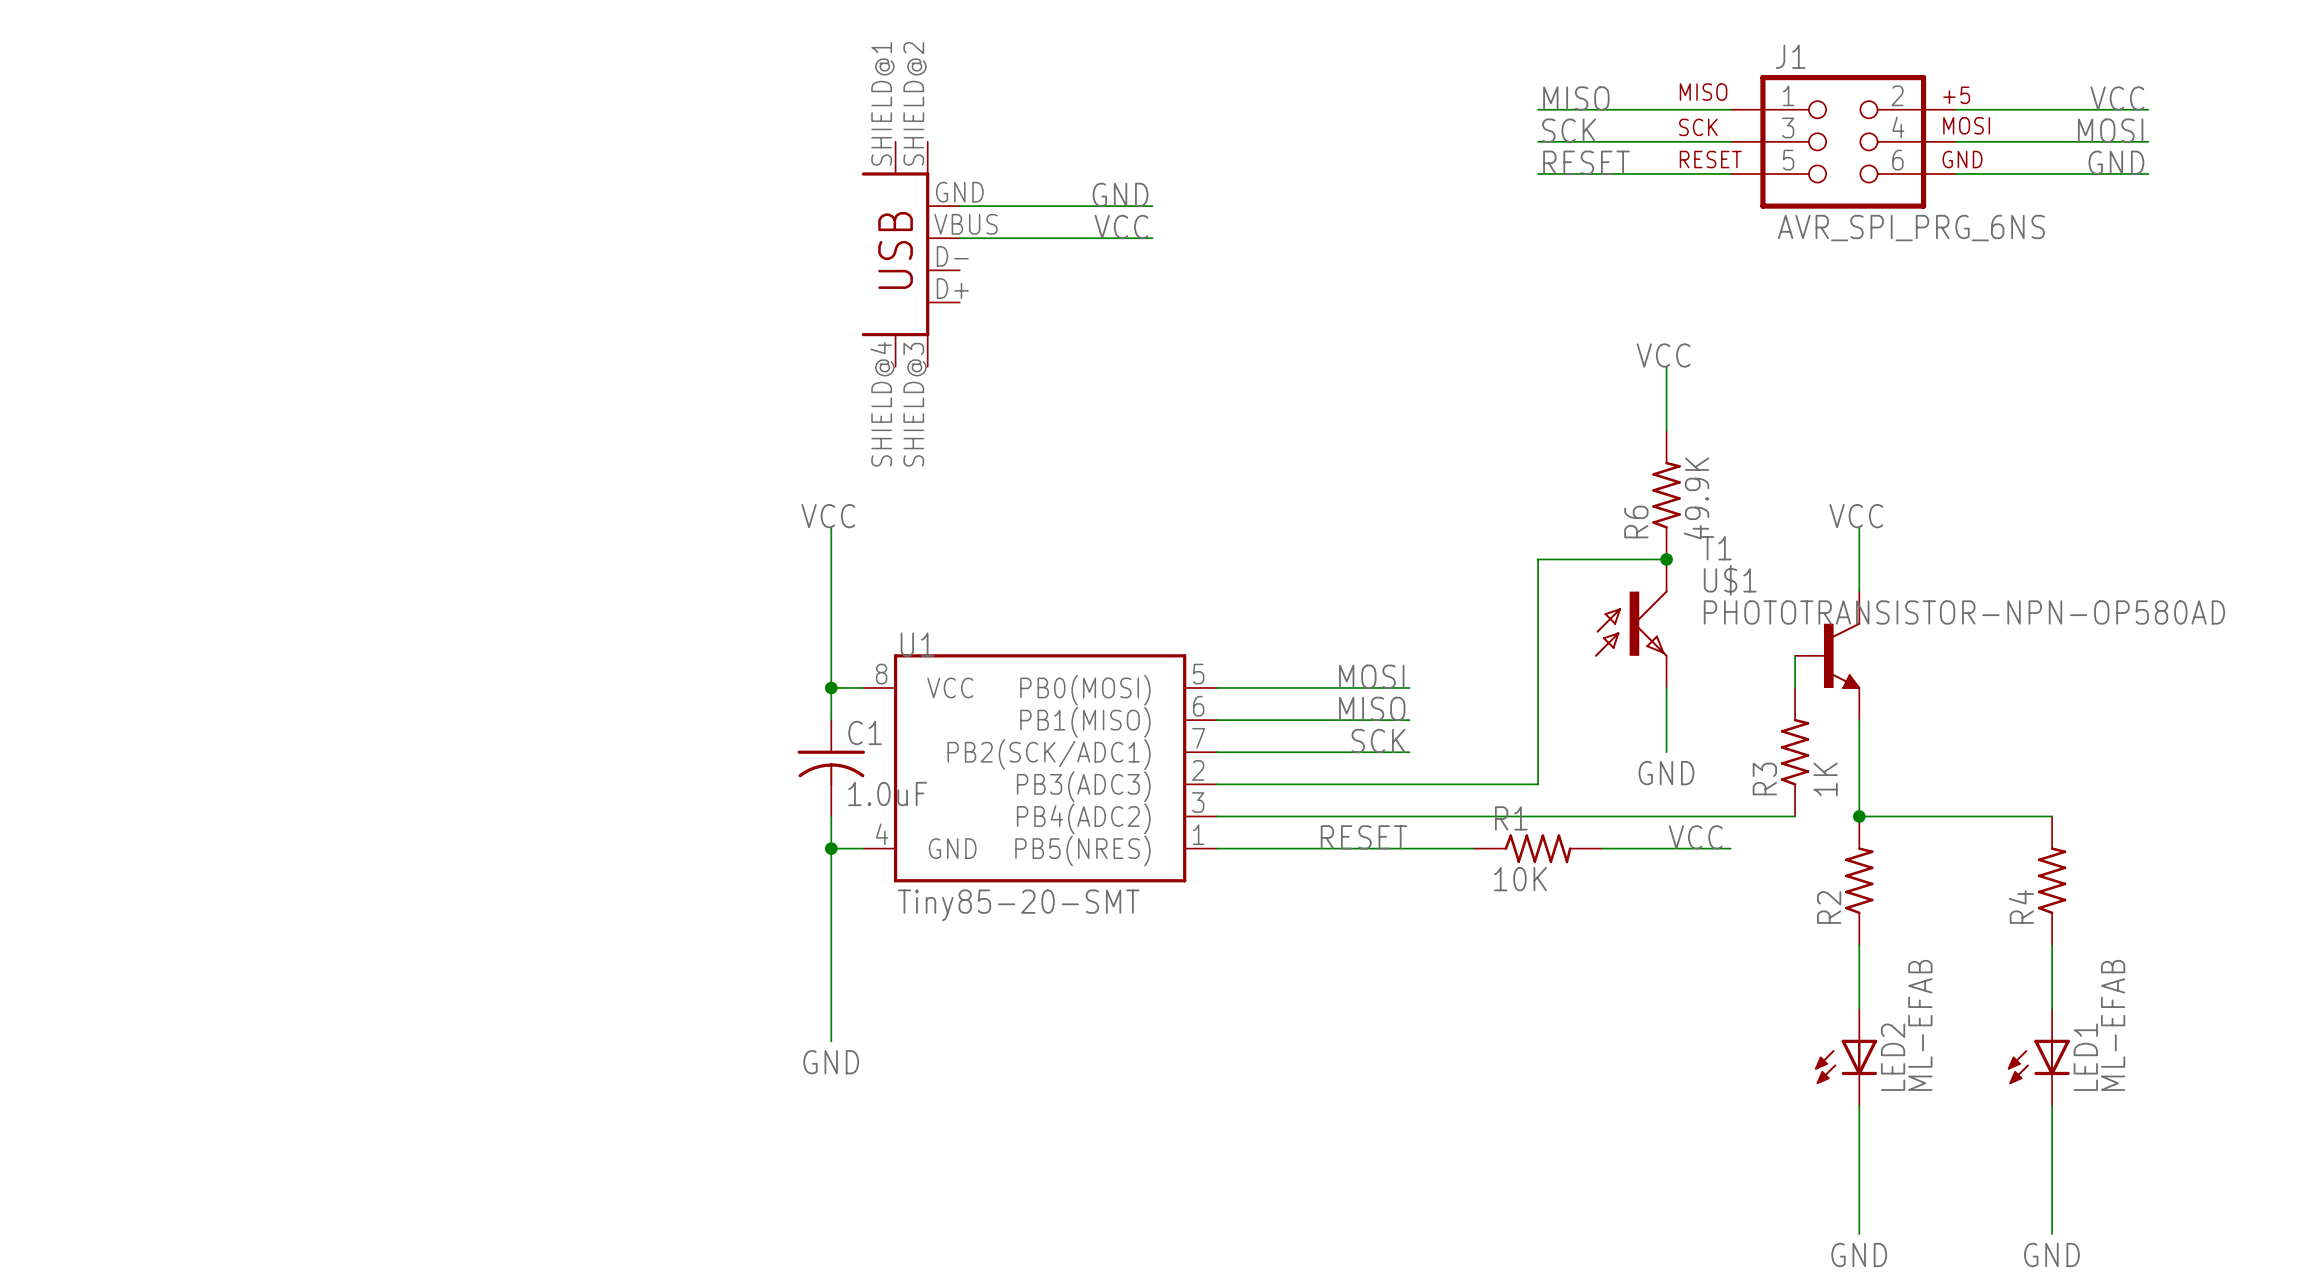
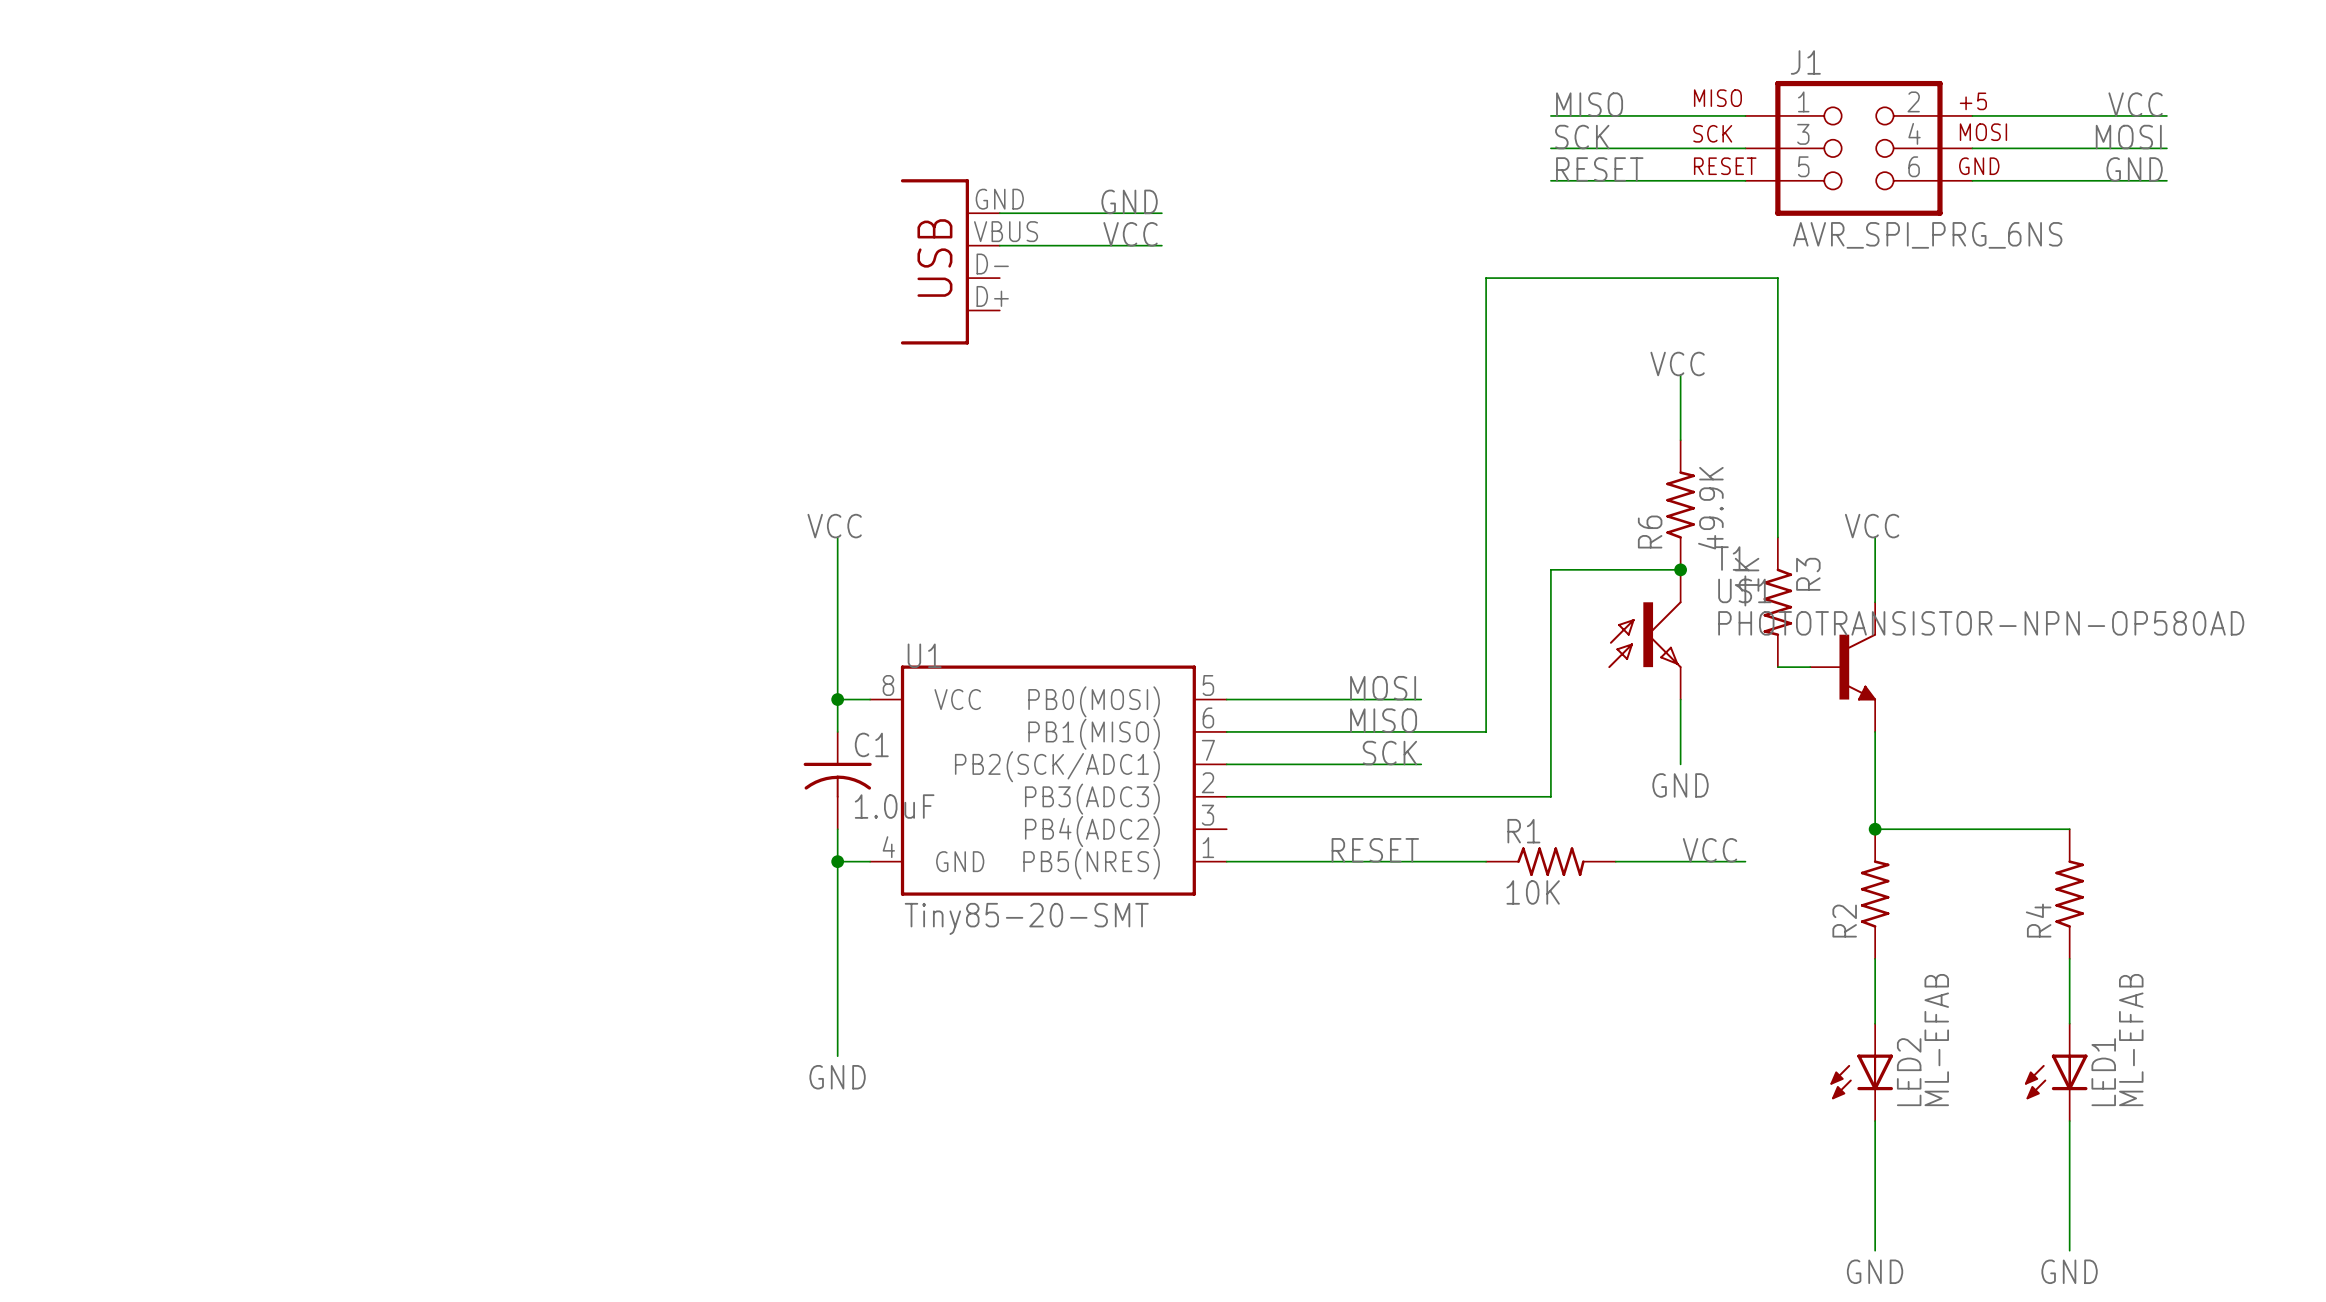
part: (910, 254) -> none
part: none -> (950, 261)
wire: none -> (1777, 537) (1777, 278) (1486, 278) (1486, 731) (1421, 731)
wire: (1795, 655) (1795, 687) -> (1810, 667) (1777, 667)
R3 rotation: 0° (1795, 752) -> 180° (1777, 602)
R3 position: (1795, 752) -> (1777, 602)
wire: (1216, 816) (1795, 816) -> none

